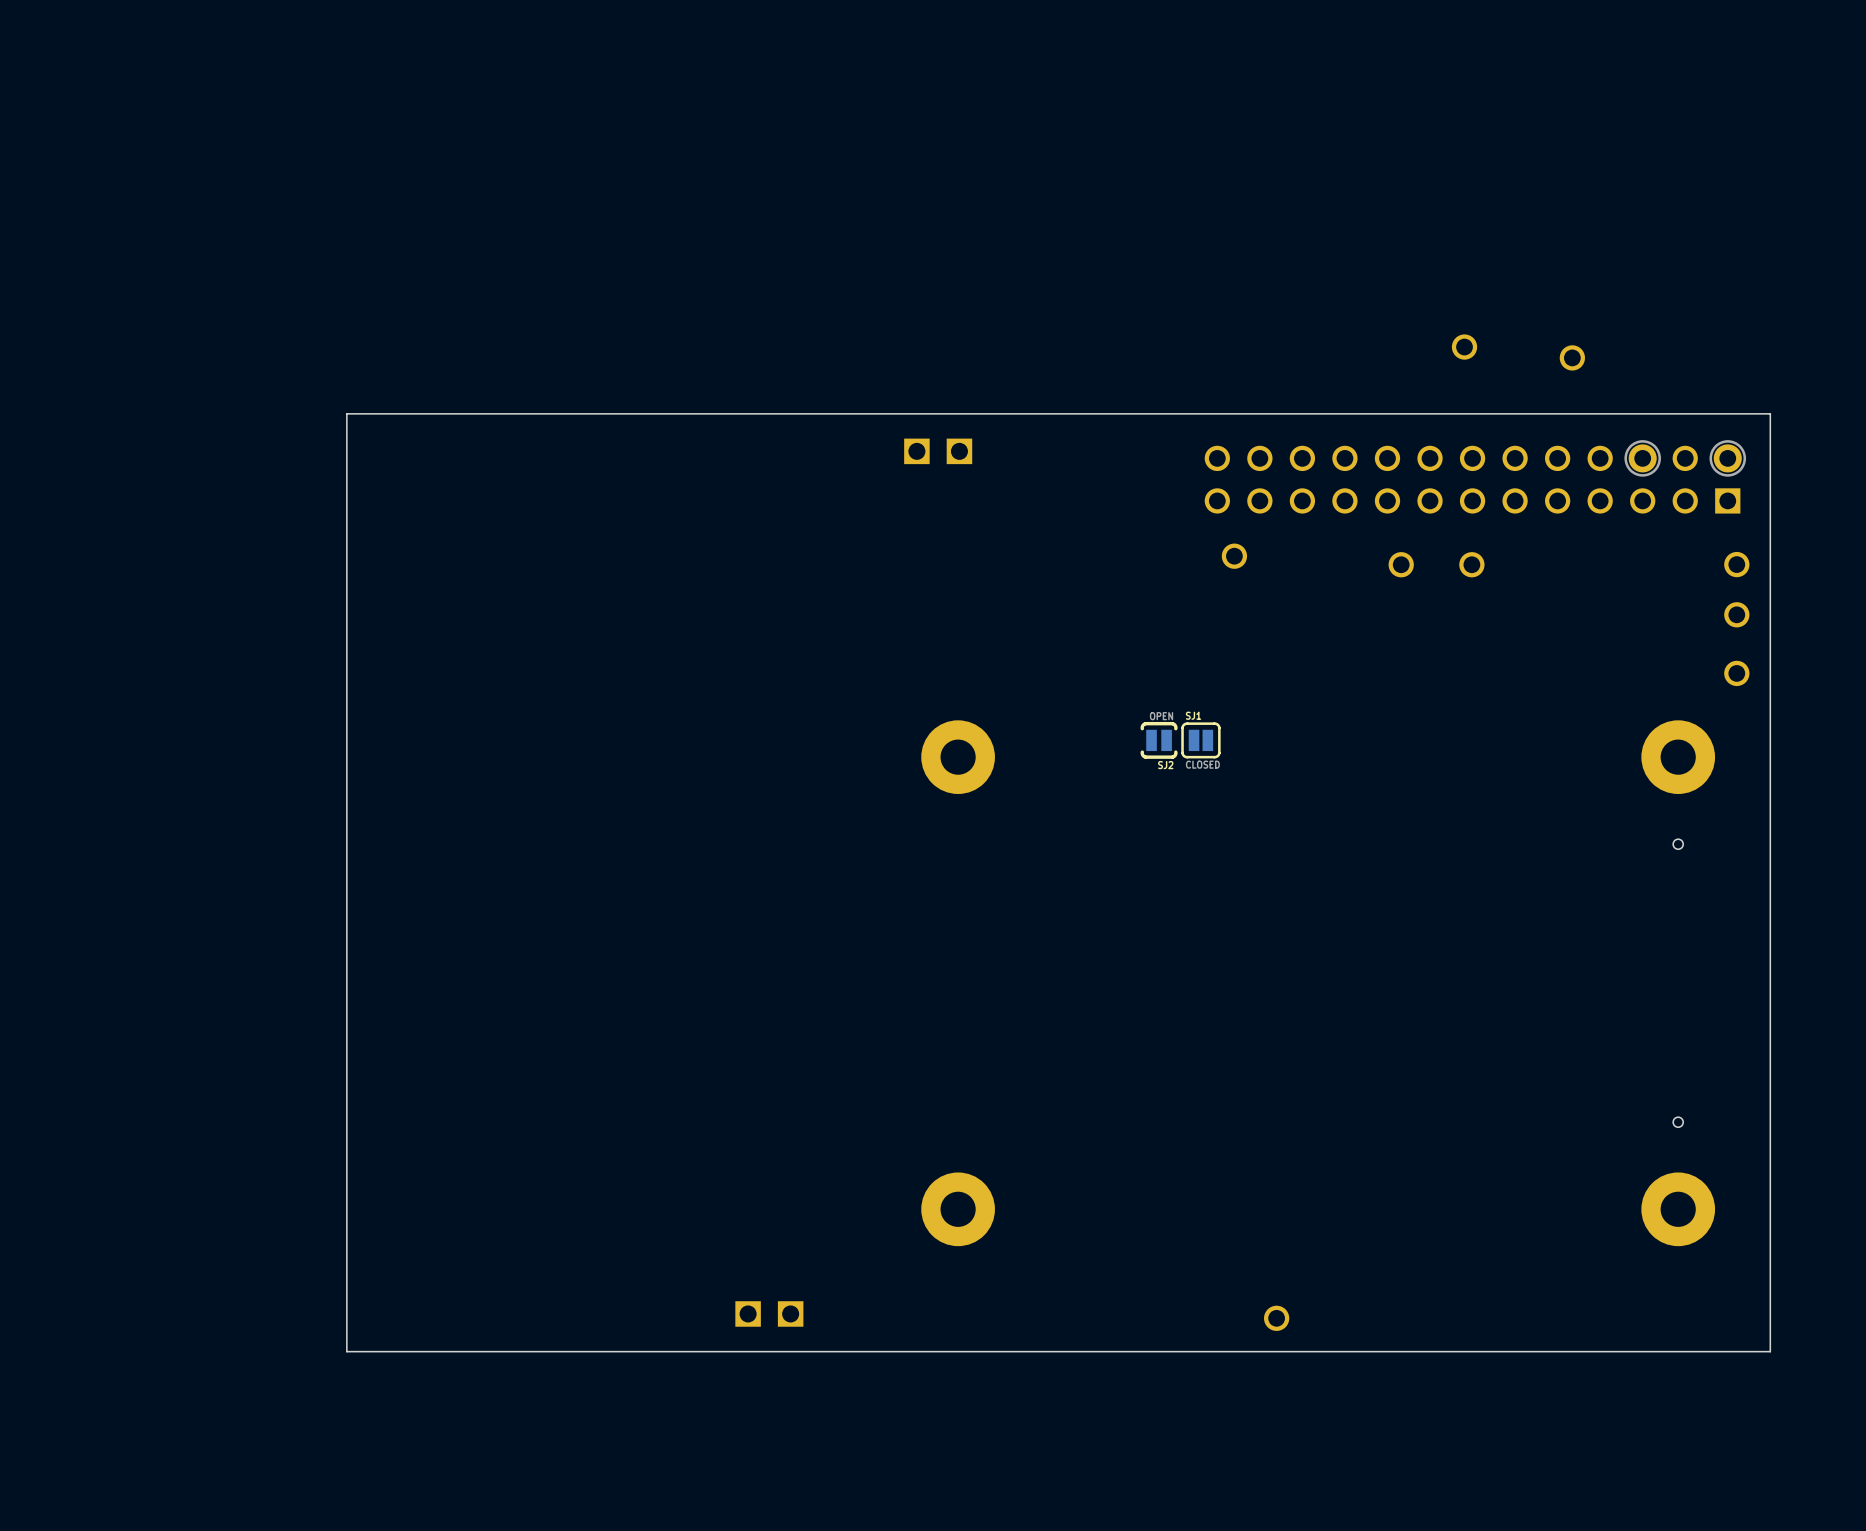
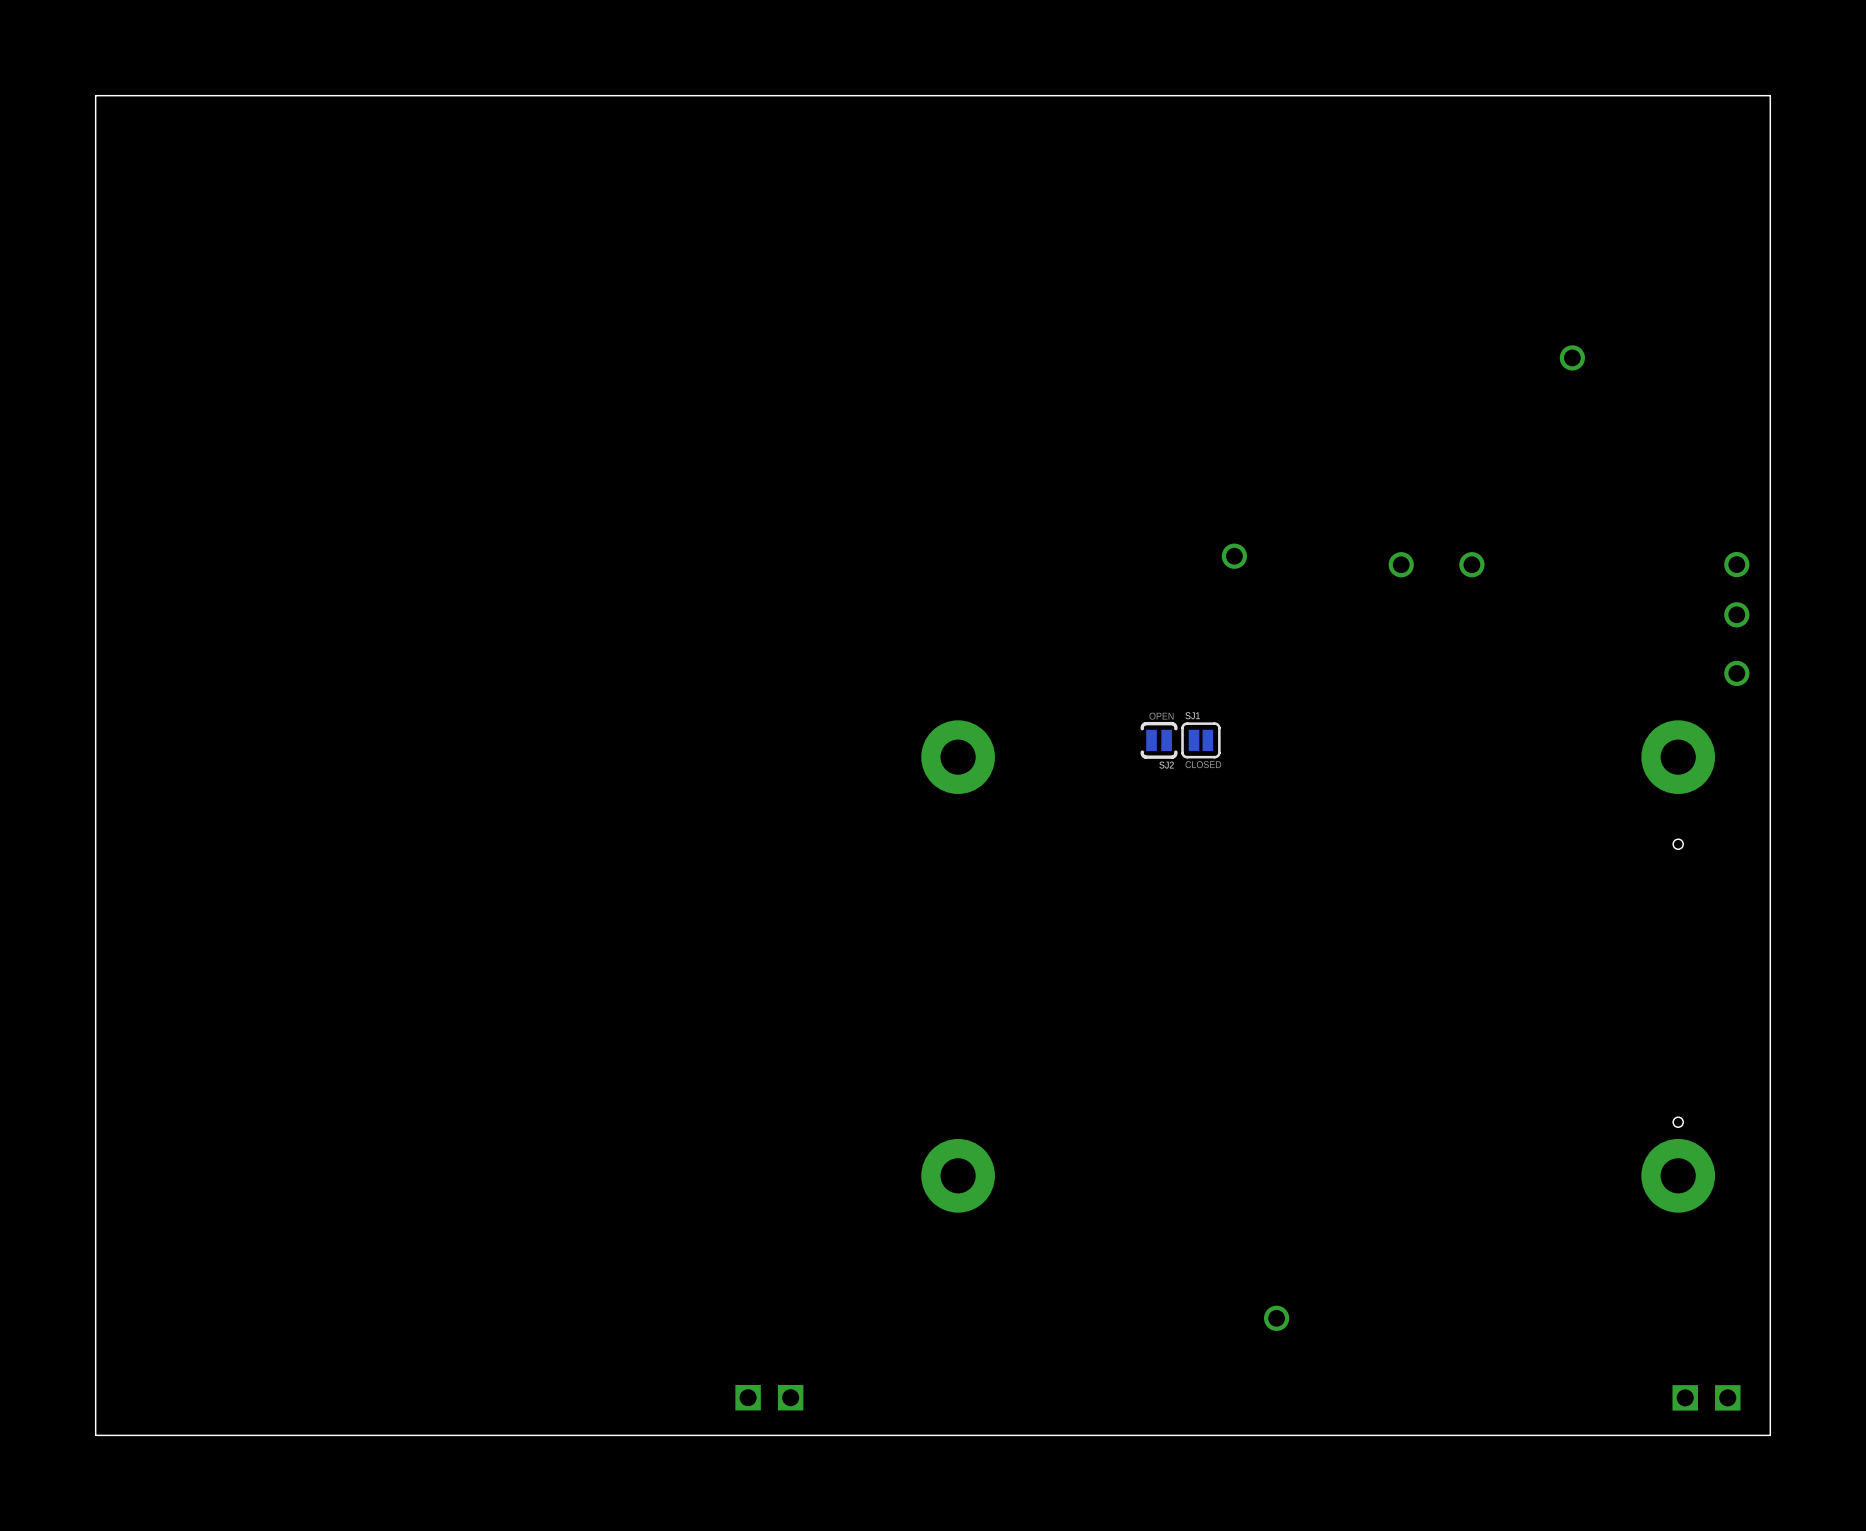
part: (1464, 347) -> none
board edge: (1770, 413) (346, 413) (346, 1351) (1770, 1351) -> (1770, 413) (1770, 95) (95, 95) (95, 1435) (1770, 1435) (1770, 1351)
part: (938, 451) -> none
part: (1475, 476) -> none
part position: (958, 1209) -> (958, 1175)
part position: (1678, 1209) -> (1678, 1175)
part position: (769, 1313) -> (769, 1397)
part: none -> (1706, 1397)

